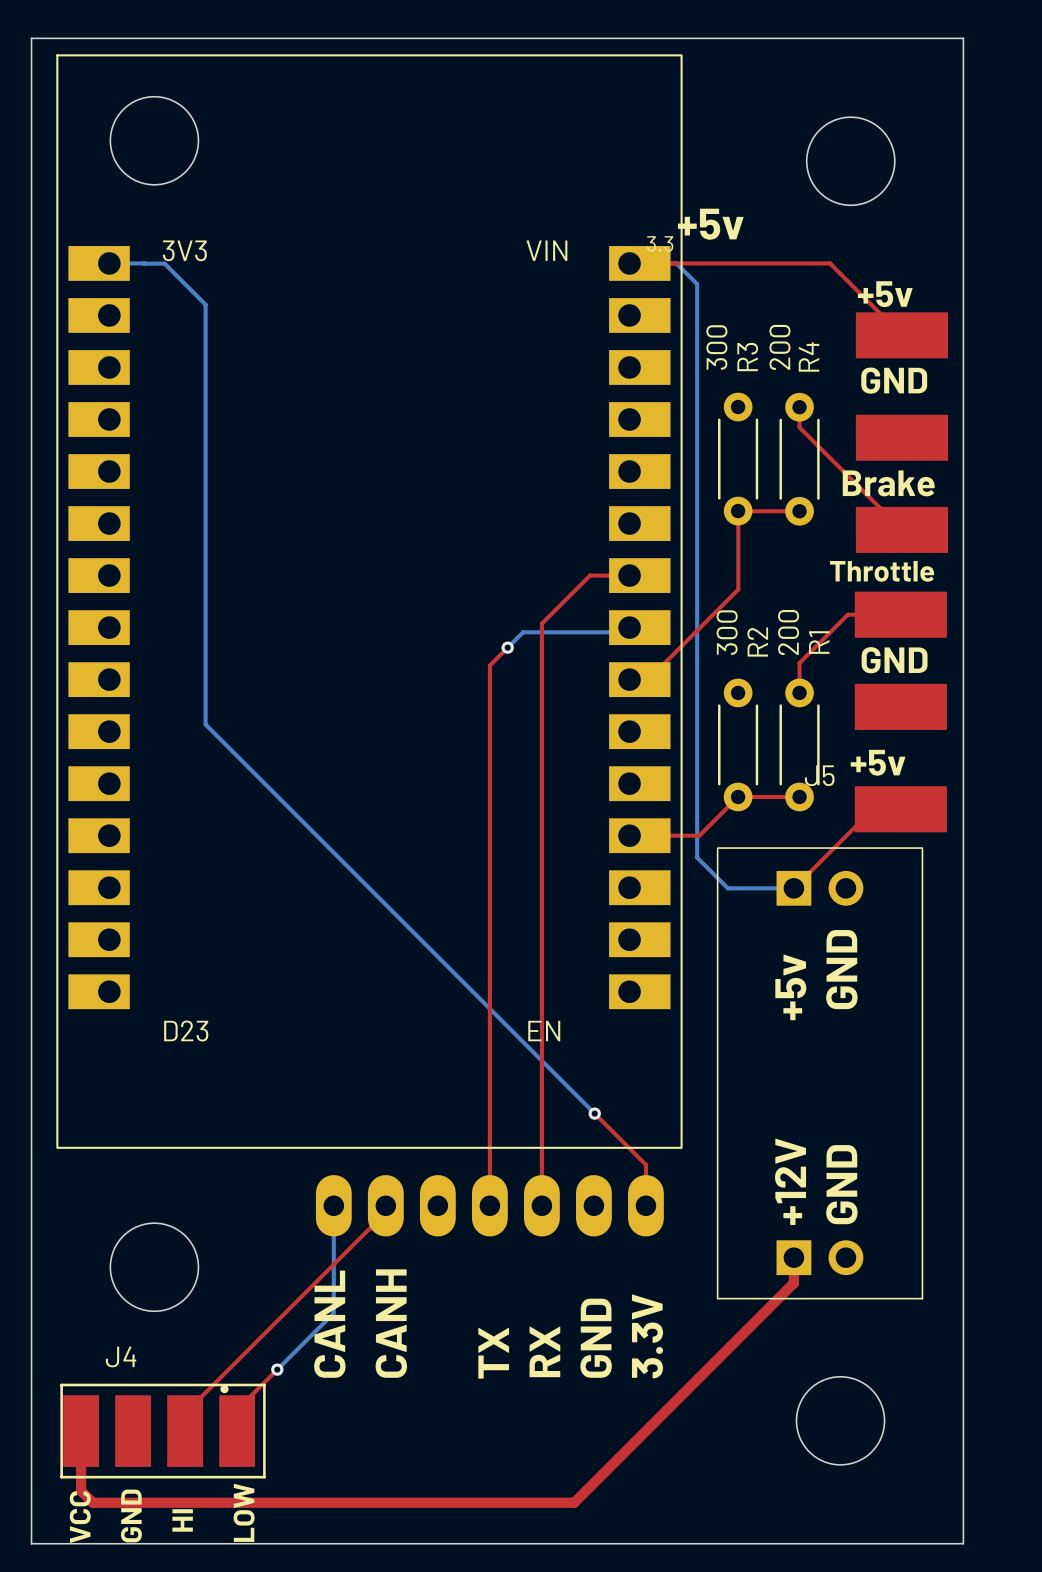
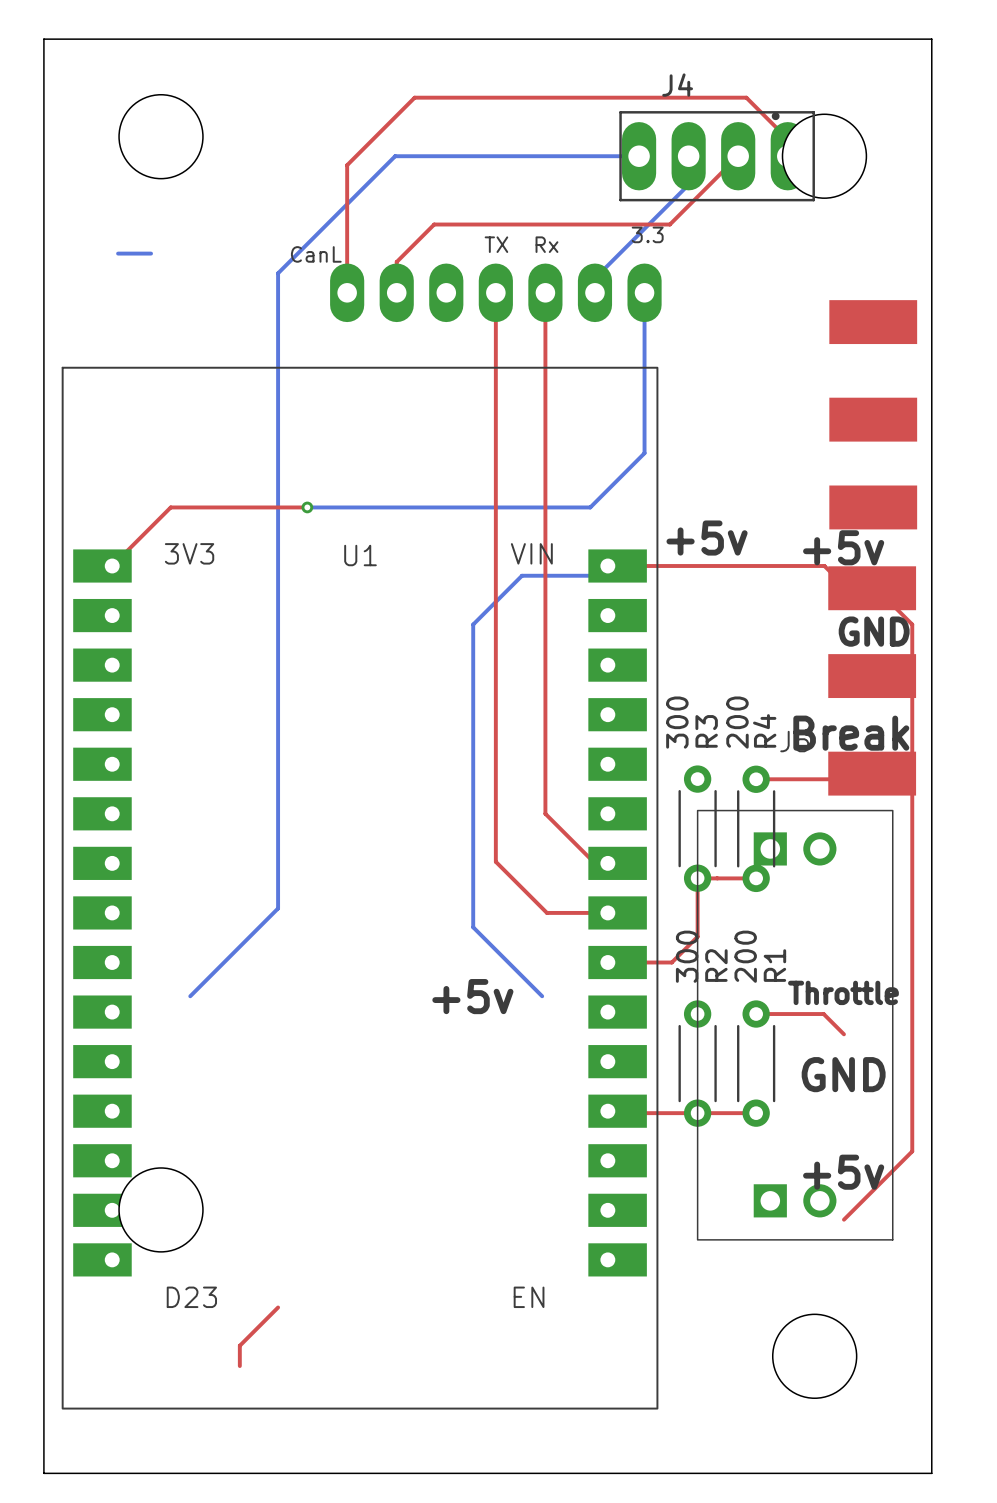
bottom track: none -> (639, 156) (395, 156) (278, 273) (278, 908) (190, 996)
bottom track: none -> (688, 156) (688, 184) (594, 278) (594, 292)
top track: none -> (738, 156) (669, 224) (434, 224) (396, 261) (396, 292)
top track: none -> (787, 156) (787, 139) (746, 97) (414, 97) (347, 165) (347, 292)
text: +5v (710, 224) -> none
text: none -> TX (496, 244)
text: none -> Rx (546, 244)
bottom track: (144, 263) (164, 263) (205, 304) (205, 724) (594, 1113) -> none
top track: (629, 263) (830, 263) (901, 335) -> none
bottom track: (629, 263) (676, 263) (697, 284) (697, 857) (727, 888) (793, 888) -> none
text: none -> CanL (316, 254)
text: +5v (885, 294) -> none
top track: none -> (495, 292) (495, 861) (546, 912) (609, 912)
part: none -> (495, 292)
bottom track: none -> (644, 292) (644, 453) (590, 507) (307, 507)
top track: none -> (541, 296) (545, 292) (545, 813) (594, 863) (609, 863)
text: GND (894, 380) -> none
top track: (799, 407) (799, 427) (901, 529) -> none
R3 position: (738, 459) -> (697, 828)
R4 position: (799, 459) -> (756, 828)
text: Brake (888, 483) -> none
top track: (799, 511) (738, 511) (738, 589) (648, 679) (629, 679) -> none
top track: none -> (307, 507) (170, 507) (112, 565)
via: none -> (307, 507)
text: none -> +5v (707, 538)
text position: Throttle (882, 571) -> Throttle (843, 992)
text: none -> +5v (843, 547)
top track: (629, 575) (590, 575) (541, 623) (541, 1205) -> none
top track: none -> (609, 565) (824, 565) (853, 595) (882, 595) (912, 624) (912, 1151) (843, 1219)
bottom track: none -> (609, 565) (600, 575) (522, 575) (473, 624) (473, 927) (542, 996)
part: (369, 601) -> none
top track: (900, 614) (847, 614) (799, 663) (799, 692) -> none
bottom track: (629, 627) (624, 632) (523, 632) (507, 647) -> none
top track: (507, 647) (489, 665) (489, 1205) -> none
via: (507, 647) -> none
R2 position: (738, 744) -> (697, 1063)
R1 position: (799, 744) -> (756, 1063)
text: +5v (878, 762) -> none
text: none -> Break (851, 733)
top track: (799, 796) (738, 796) (699, 835) (629, 835) -> none
top track: (900, 809) (872, 809) (793, 888) -> none
top track: none -> (756, 779) (853, 780)
top track: none -> (697, 878) (697, 936) (671, 962) (609, 962)
top track: none -> (697, 878) (756, 878)
U1: none -> (360, 888)
text: GND (841, 969) -> none
text: +5v (790, 987) -> none
text: none -> +5v (472, 996)
top track: none -> (756, 1014) (823, 1014) (843, 1034)
top track: (594, 1113) (645, 1164) (645, 1205) -> none
via: (594, 1113) -> none
top track: none -> (609, 1111) (611, 1113) (756, 1113)
text: +12V (790, 1181) -> none
text rotation: 0° (841, 1184) -> 90° clockwise (843, 1074)
bottom track: (333, 1205) (333, 1313) (277, 1369) -> none
top track: (385, 1205) (385, 1212) (185, 1413) (185, 1431) -> none
part: (489, 1205) -> none
text: none -> +5v (843, 1172)
top track: (793, 1257) (793, 1283) (574, 1502) (92, 1502) (81, 1490) (81, 1431) -> none
text: CANH (391, 1323) -> none
text: CANL (329, 1324) -> none
text: 3.3V (647, 1336) -> none
text: GND (596, 1338) -> none
text: RX (544, 1351) -> none
text: TX (493, 1353) -> none
via: (277, 1369) -> none
J4 footprint: [60, 1383, 266, 1479] -> [619, 111, 815, 202]
text: LOW (244, 1512) -> none
text: GND (131, 1515) -> none
text: VCC (80, 1517) -> none
text: HI (182, 1520) -> none

